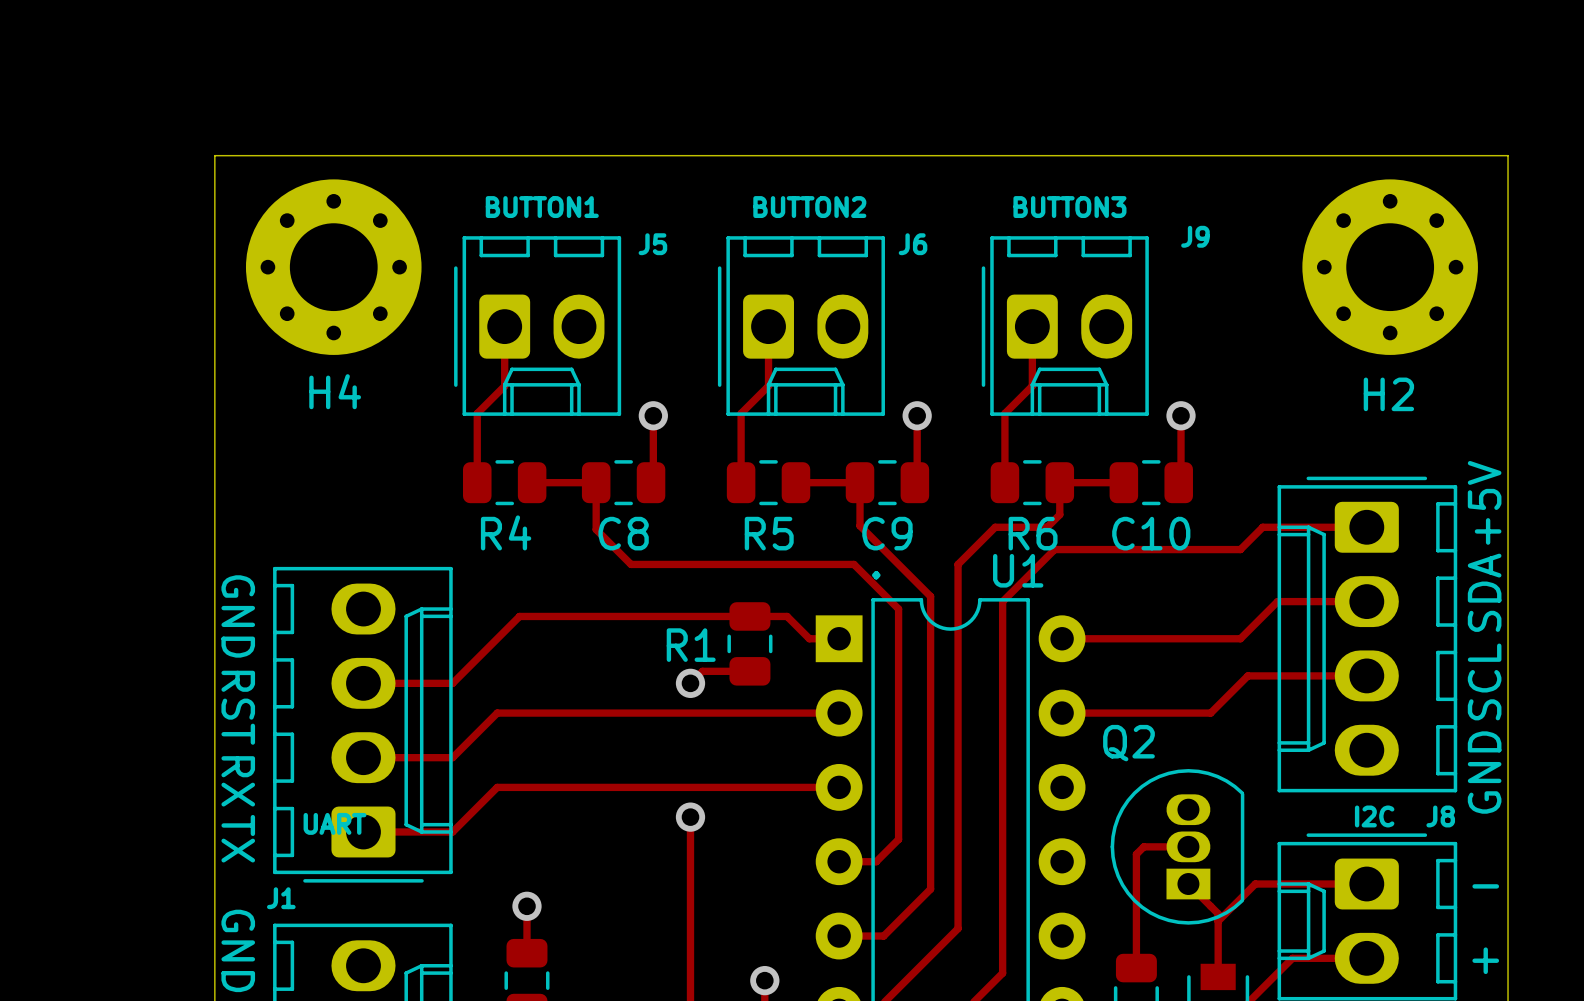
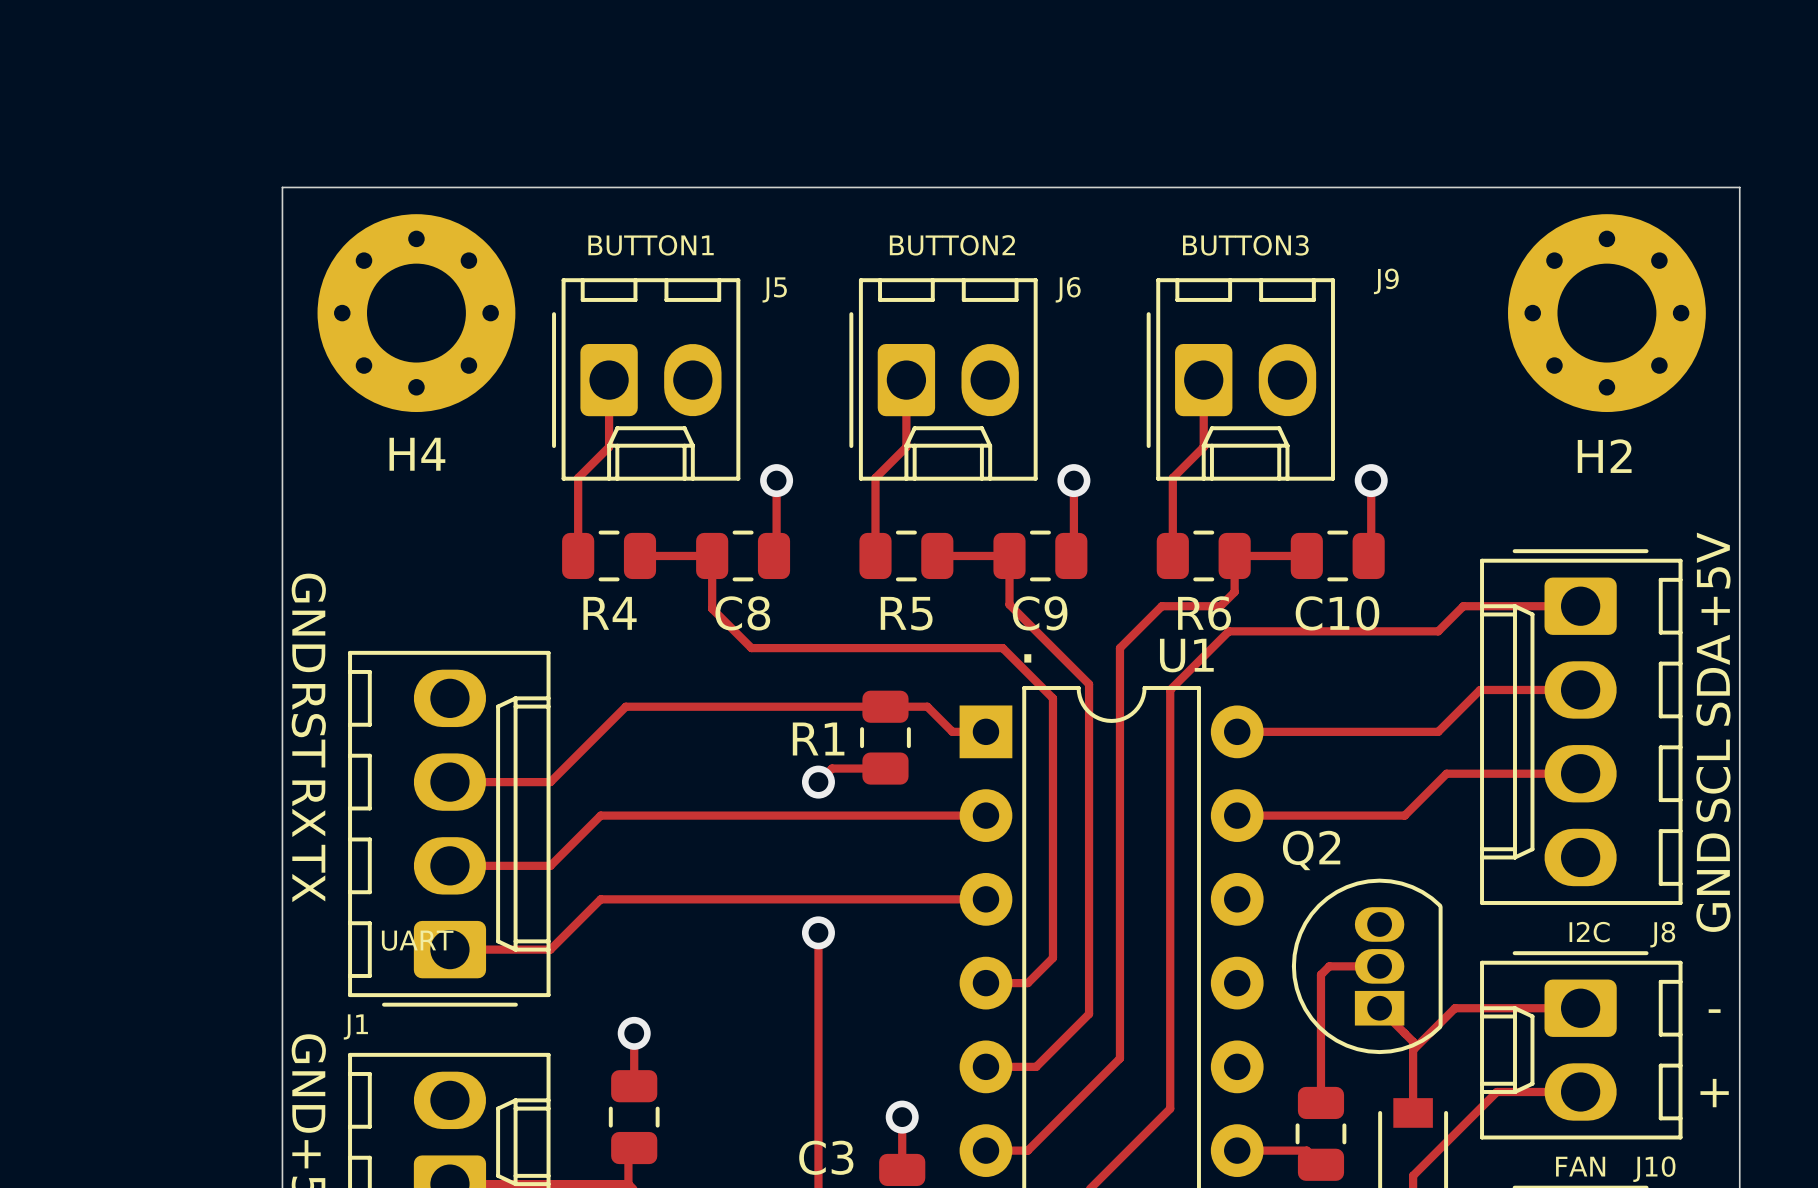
text: none -> GND (308, 622)
text: GND (238, 616) -> RST (308, 725)
text: RST (238, 707) -> RX (308, 808)
text: RX (238, 781) -> TX (308, 873)
text: TX (238, 838) -> none

